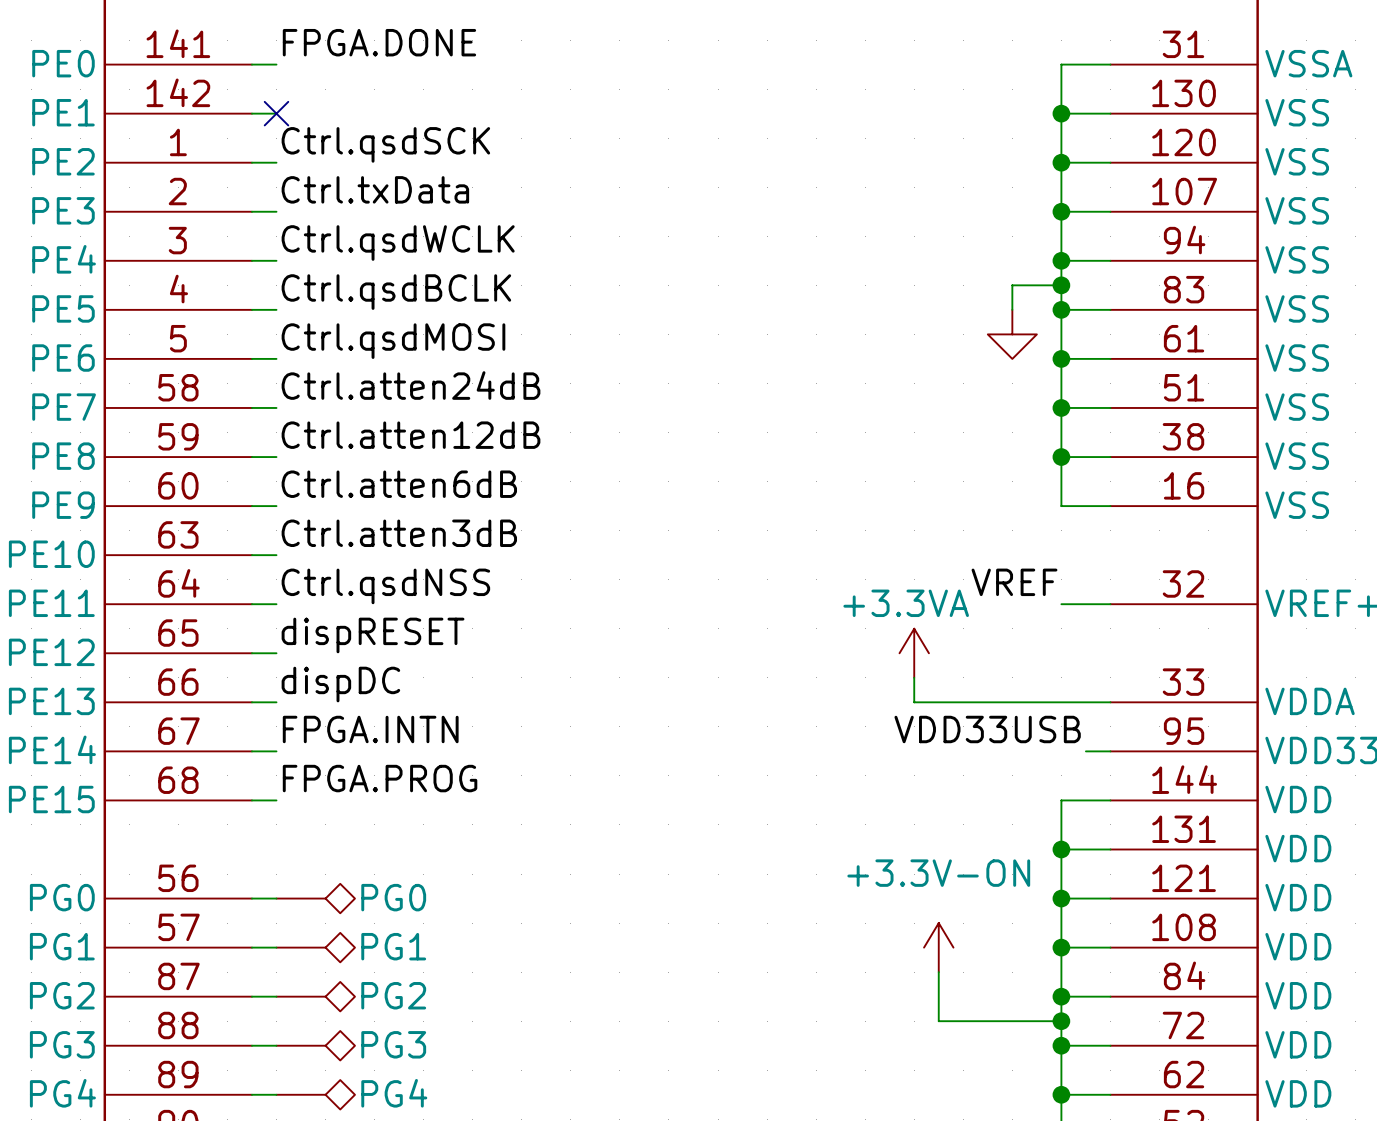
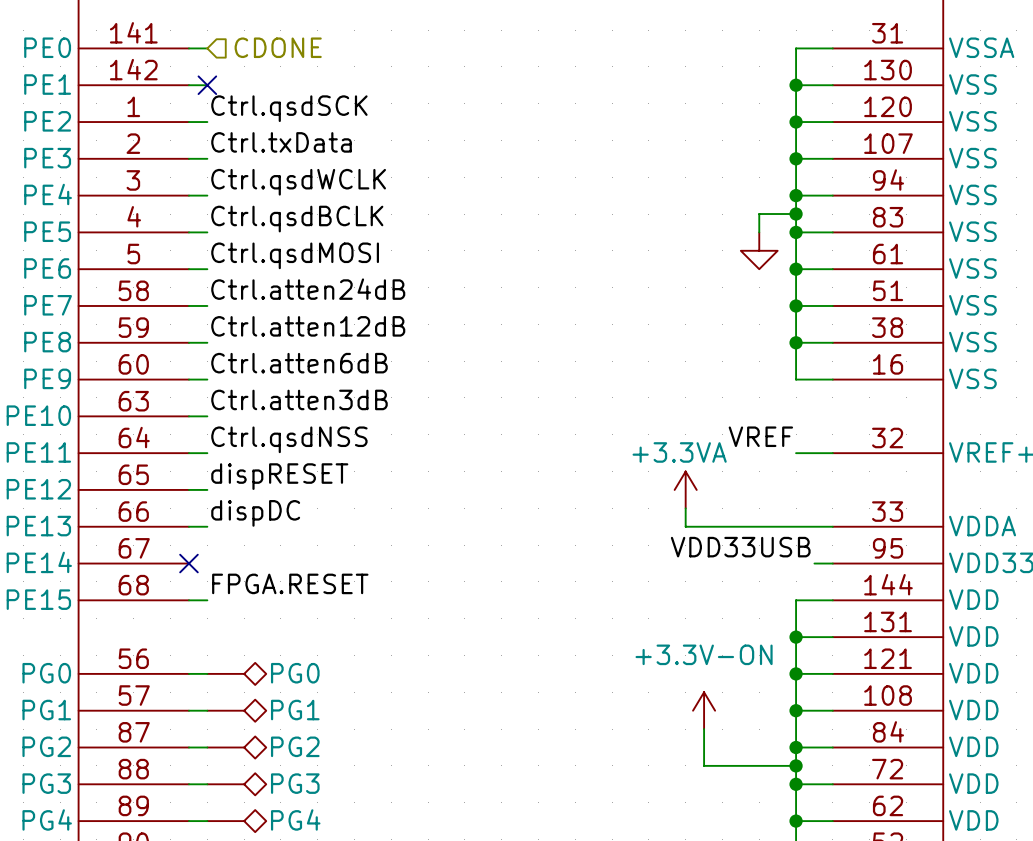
label: FPGA.DONE (379, 42) -> none
hierarchical label: none -> CDONE (278, 47)
label: FPGA.INTN (370, 729) -> none
wire: (251, 751) (276, 751) -> none
no-connect mark: none -> (188, 563)
label: FPGA.PROG (380, 778) -> FPGA.RESET (290, 583)

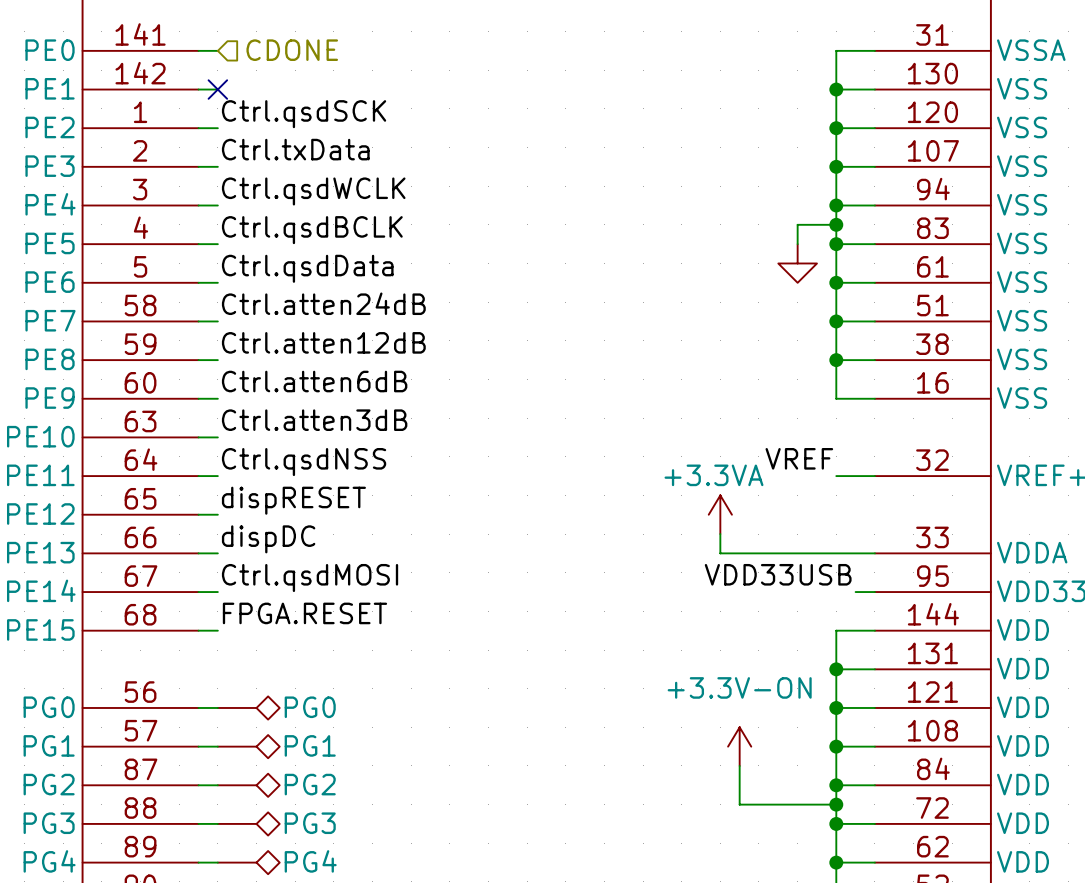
label: Ctrl.qsdMOSI (295, 255) -> Ctrl.qsdData (307, 268)
label: none -> Ctrl.qsdMOSI (310, 578)
wire: none -> (198, 592) (217, 592)
no-connect mark: (188, 563) -> none

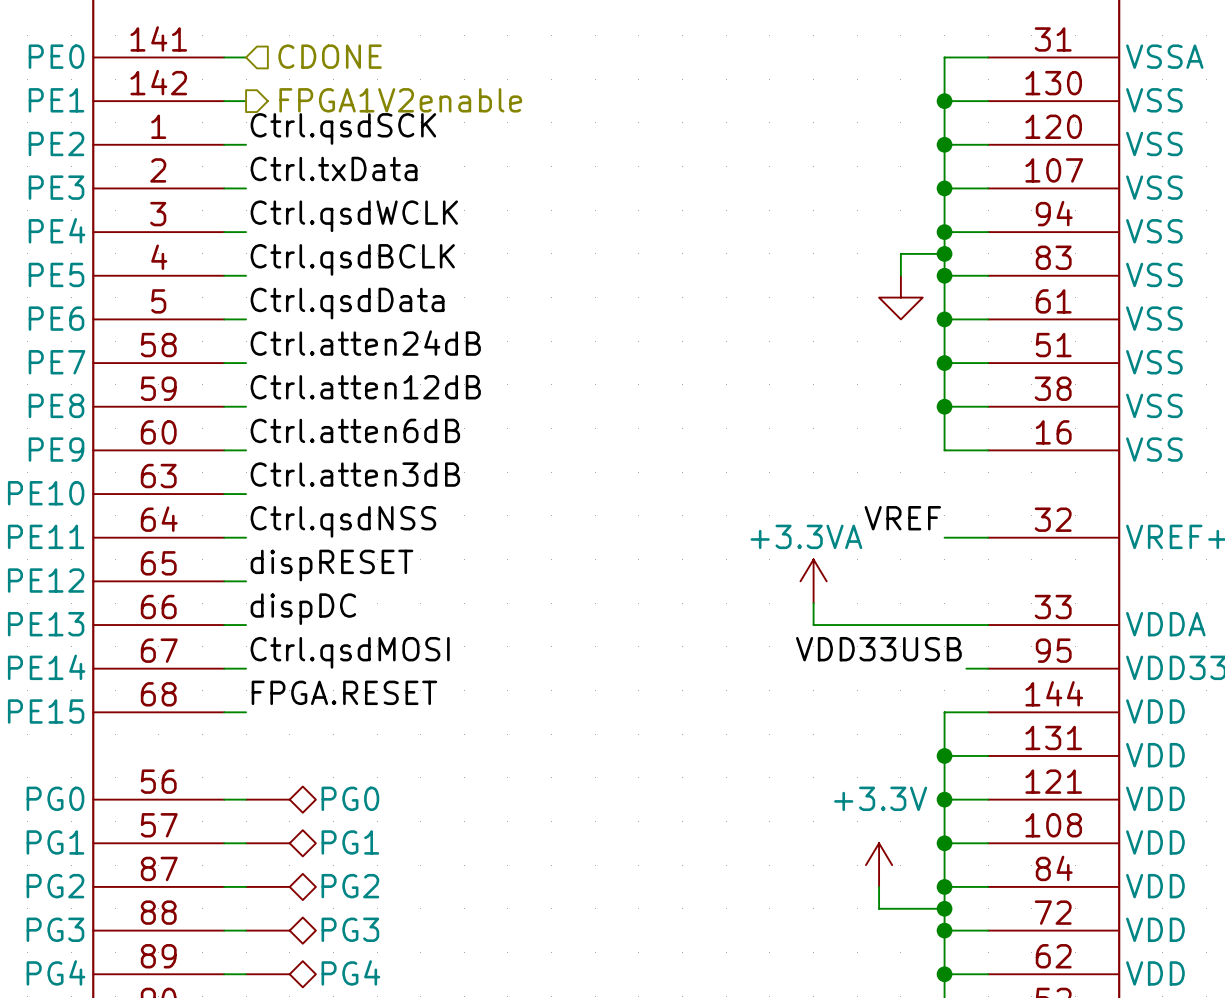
hierarchical label: none -> FPGA1V2enable (400, 100)
no-connect mark: (217, 89) -> none
power symbol: +3.3V-ON (739, 746) -> none
wire: (739, 765) (739, 804) (778, 804) -> (879, 886) (879, 908)
power symbol: none -> +3.3V (879, 865)

